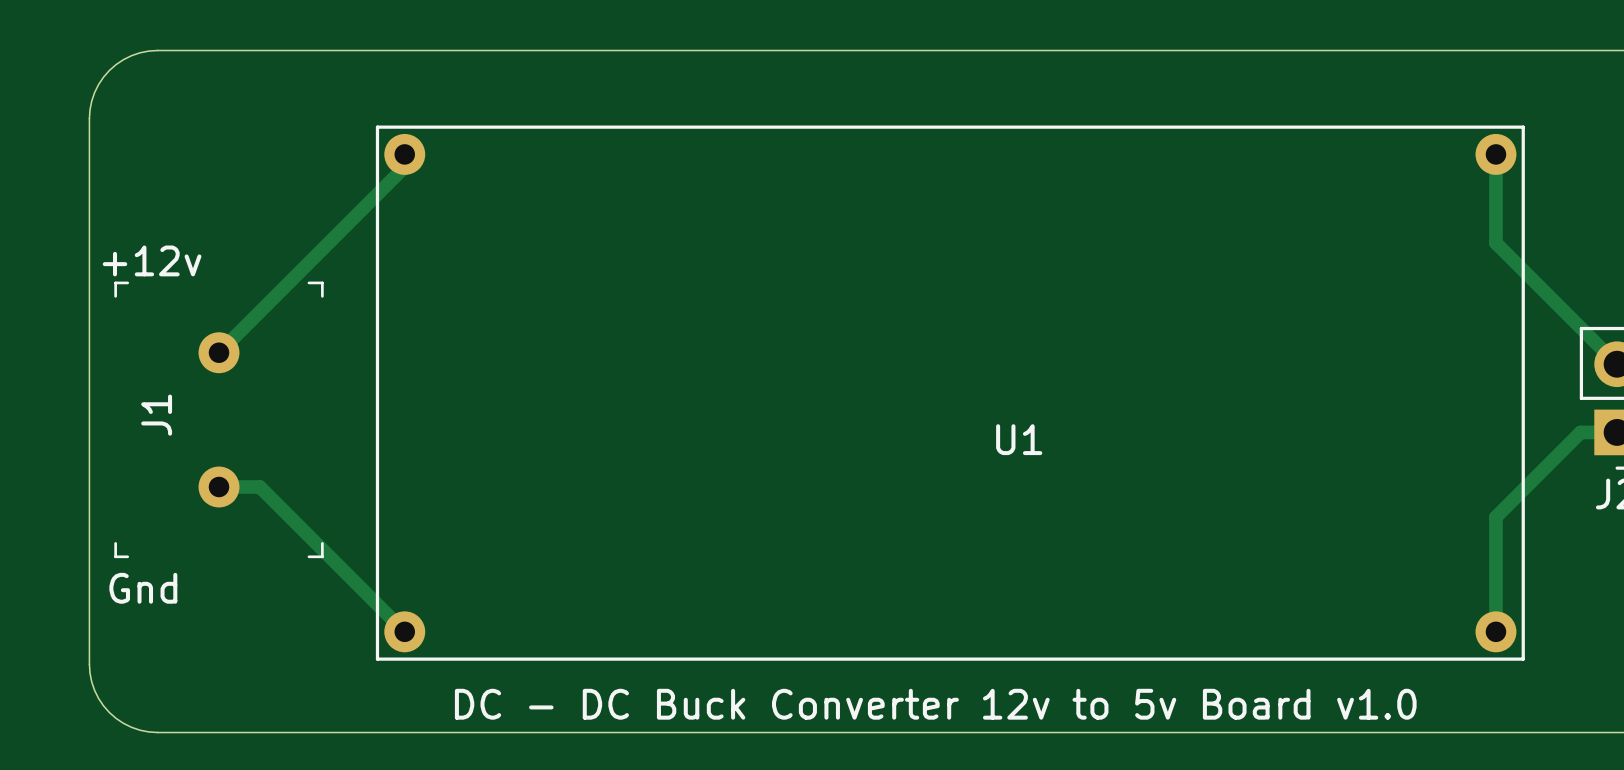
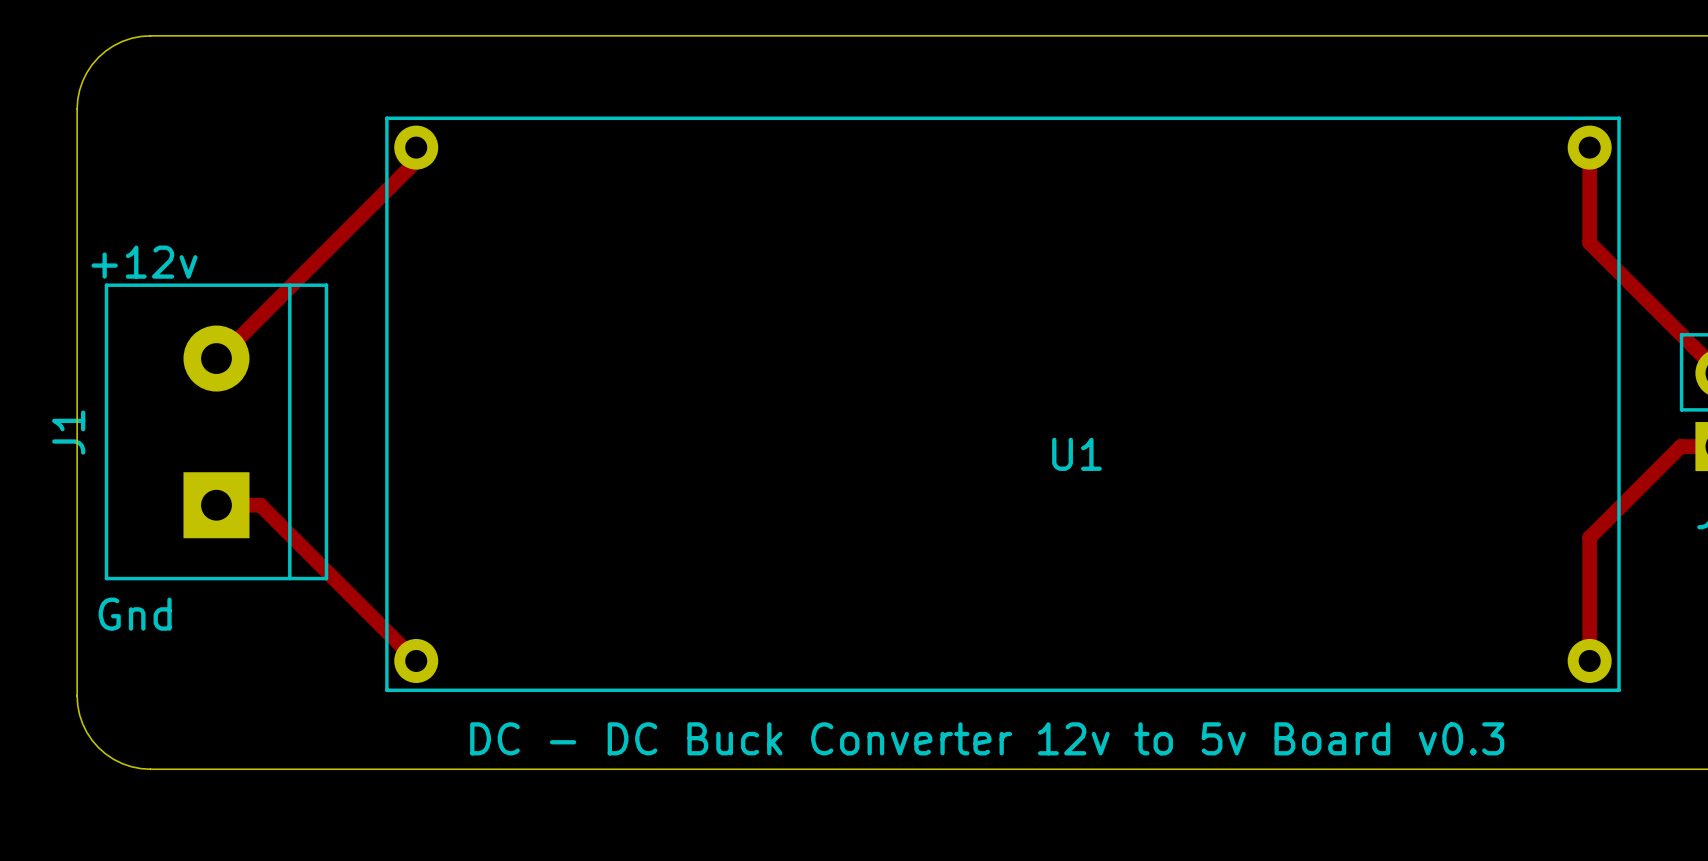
J1 footprint: [114, 281, 324, 559] -> [104, 283, 329, 581]
J1 name position: J1 (156, 415) -> J1 (68, 432)
text: DC - DC Buck Converter 12v to 5v Board v1.0 (935, 704) -> DC - DC Buck Converter 12v to 5v Board v0.3 (987, 738)

